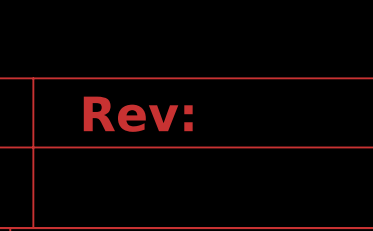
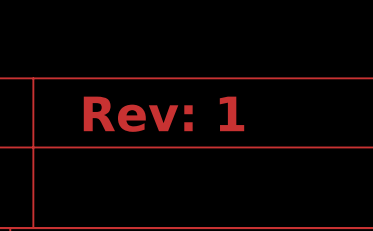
title block: Rev: (138, 114) -> Rev: 1 (163, 114)

